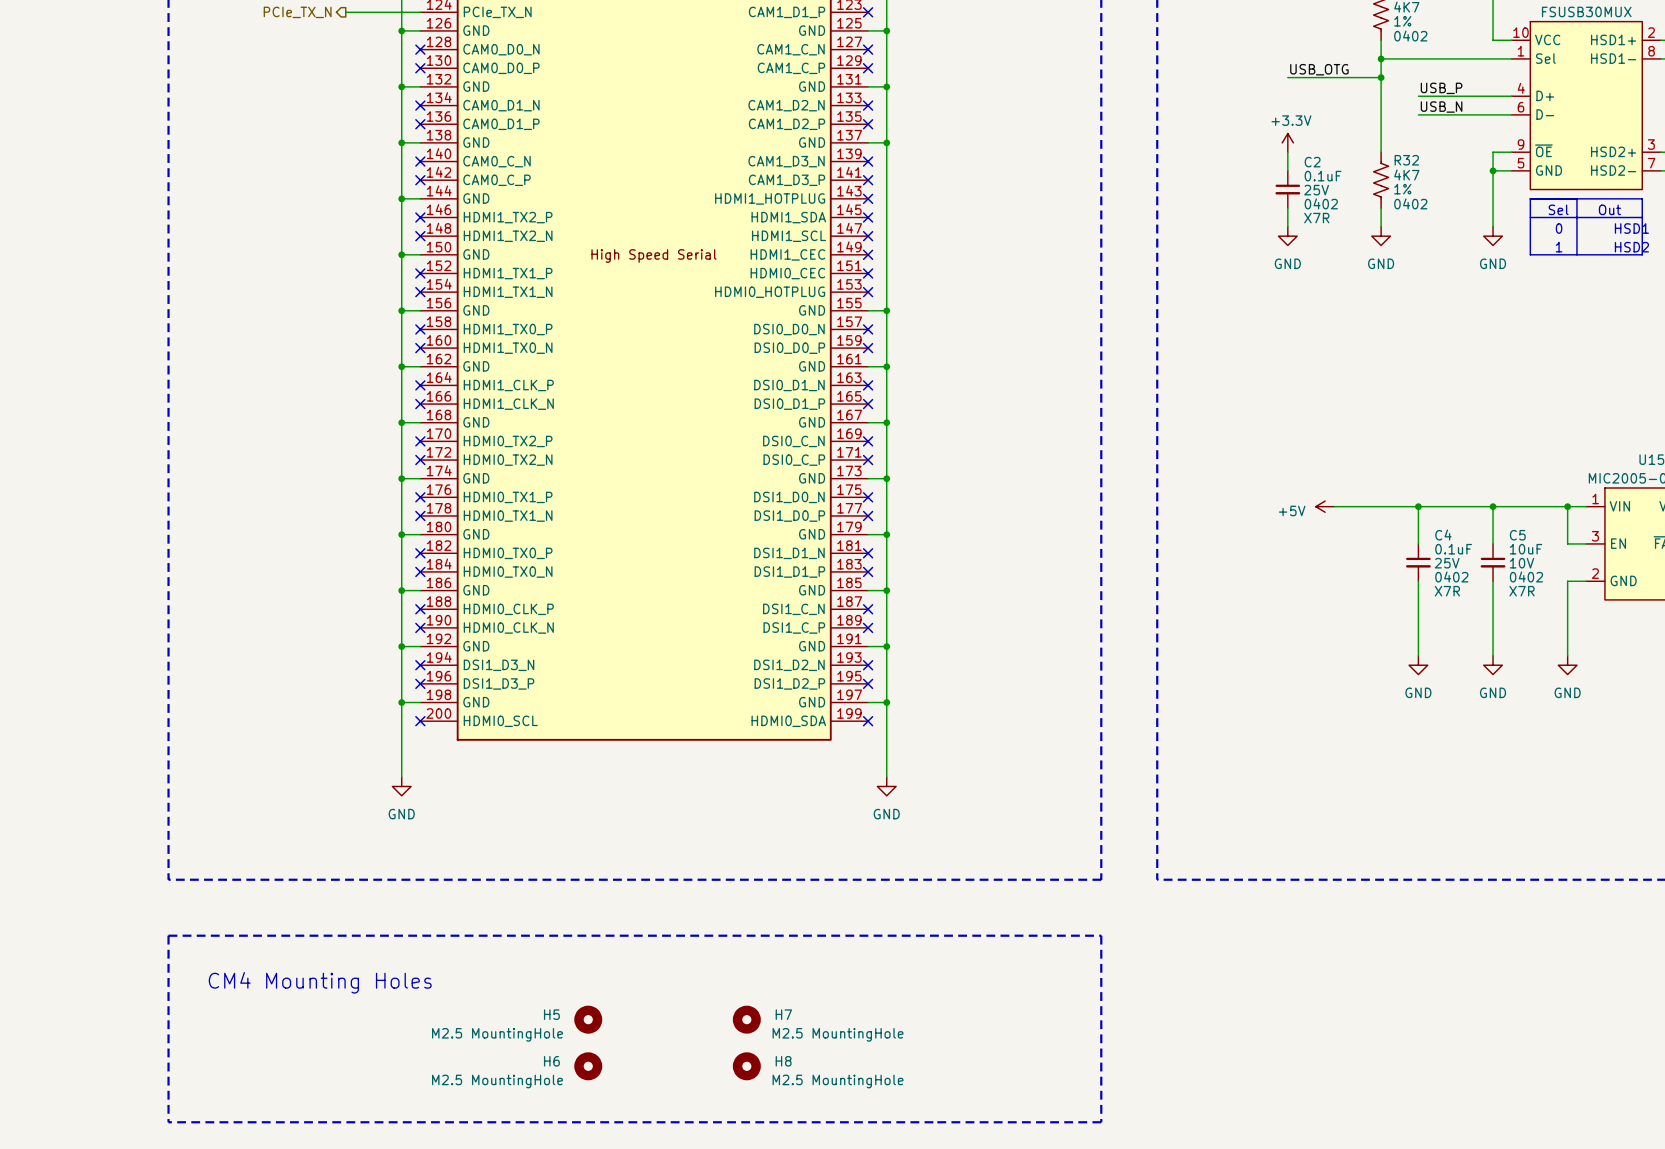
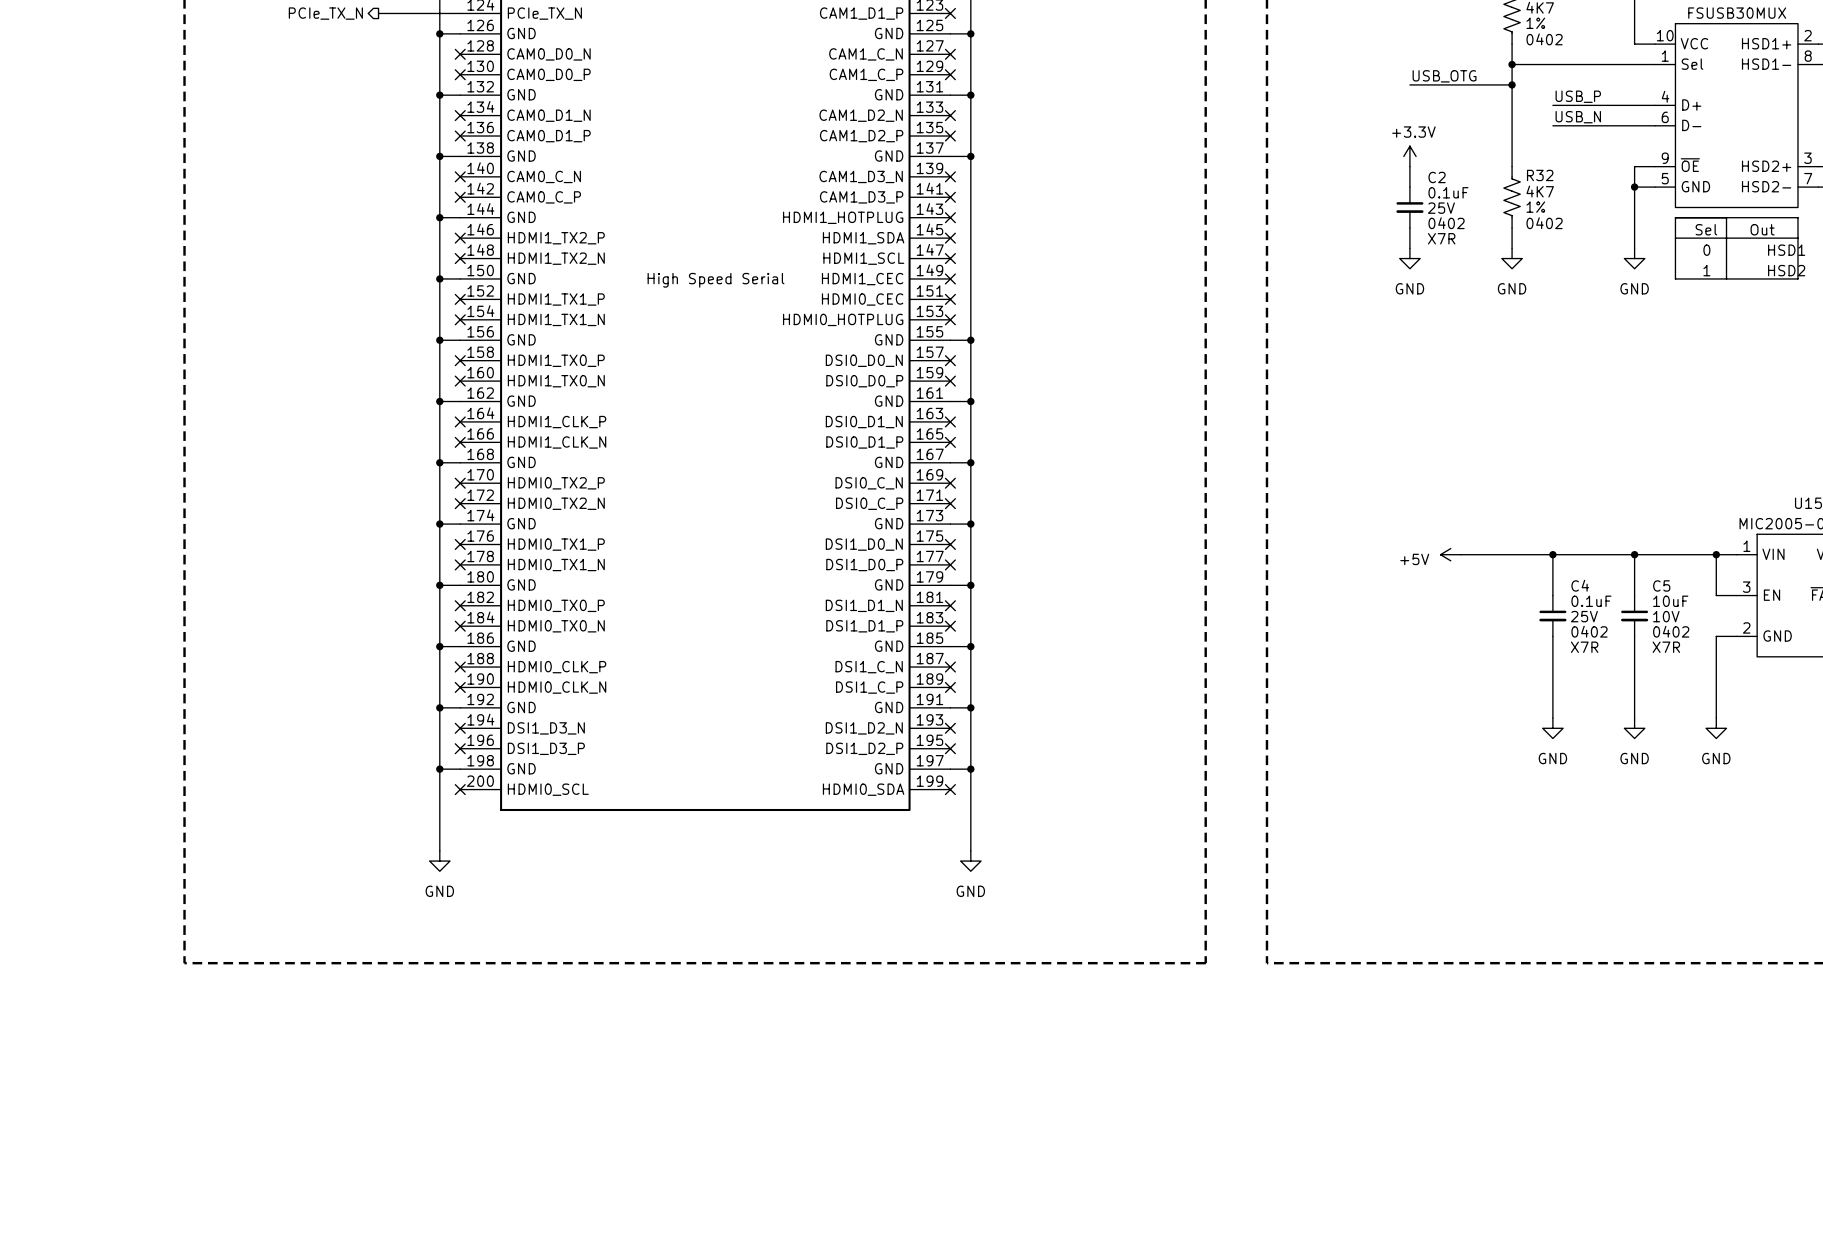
line: (168, 935) (168, 1122) (1101, 1122) (1101, 935) (168, 935) -> none
text: CM4 Mounting Holes (320, 982) -> none
H5: M2.5 MountingHole (588, 1019) -> none
H7: M2.5 MountingHole (746, 1019) -> none
H6: M2.5 MountingHole (588, 1066) -> none
H8: M2.5 MountingHole (746, 1066) -> none

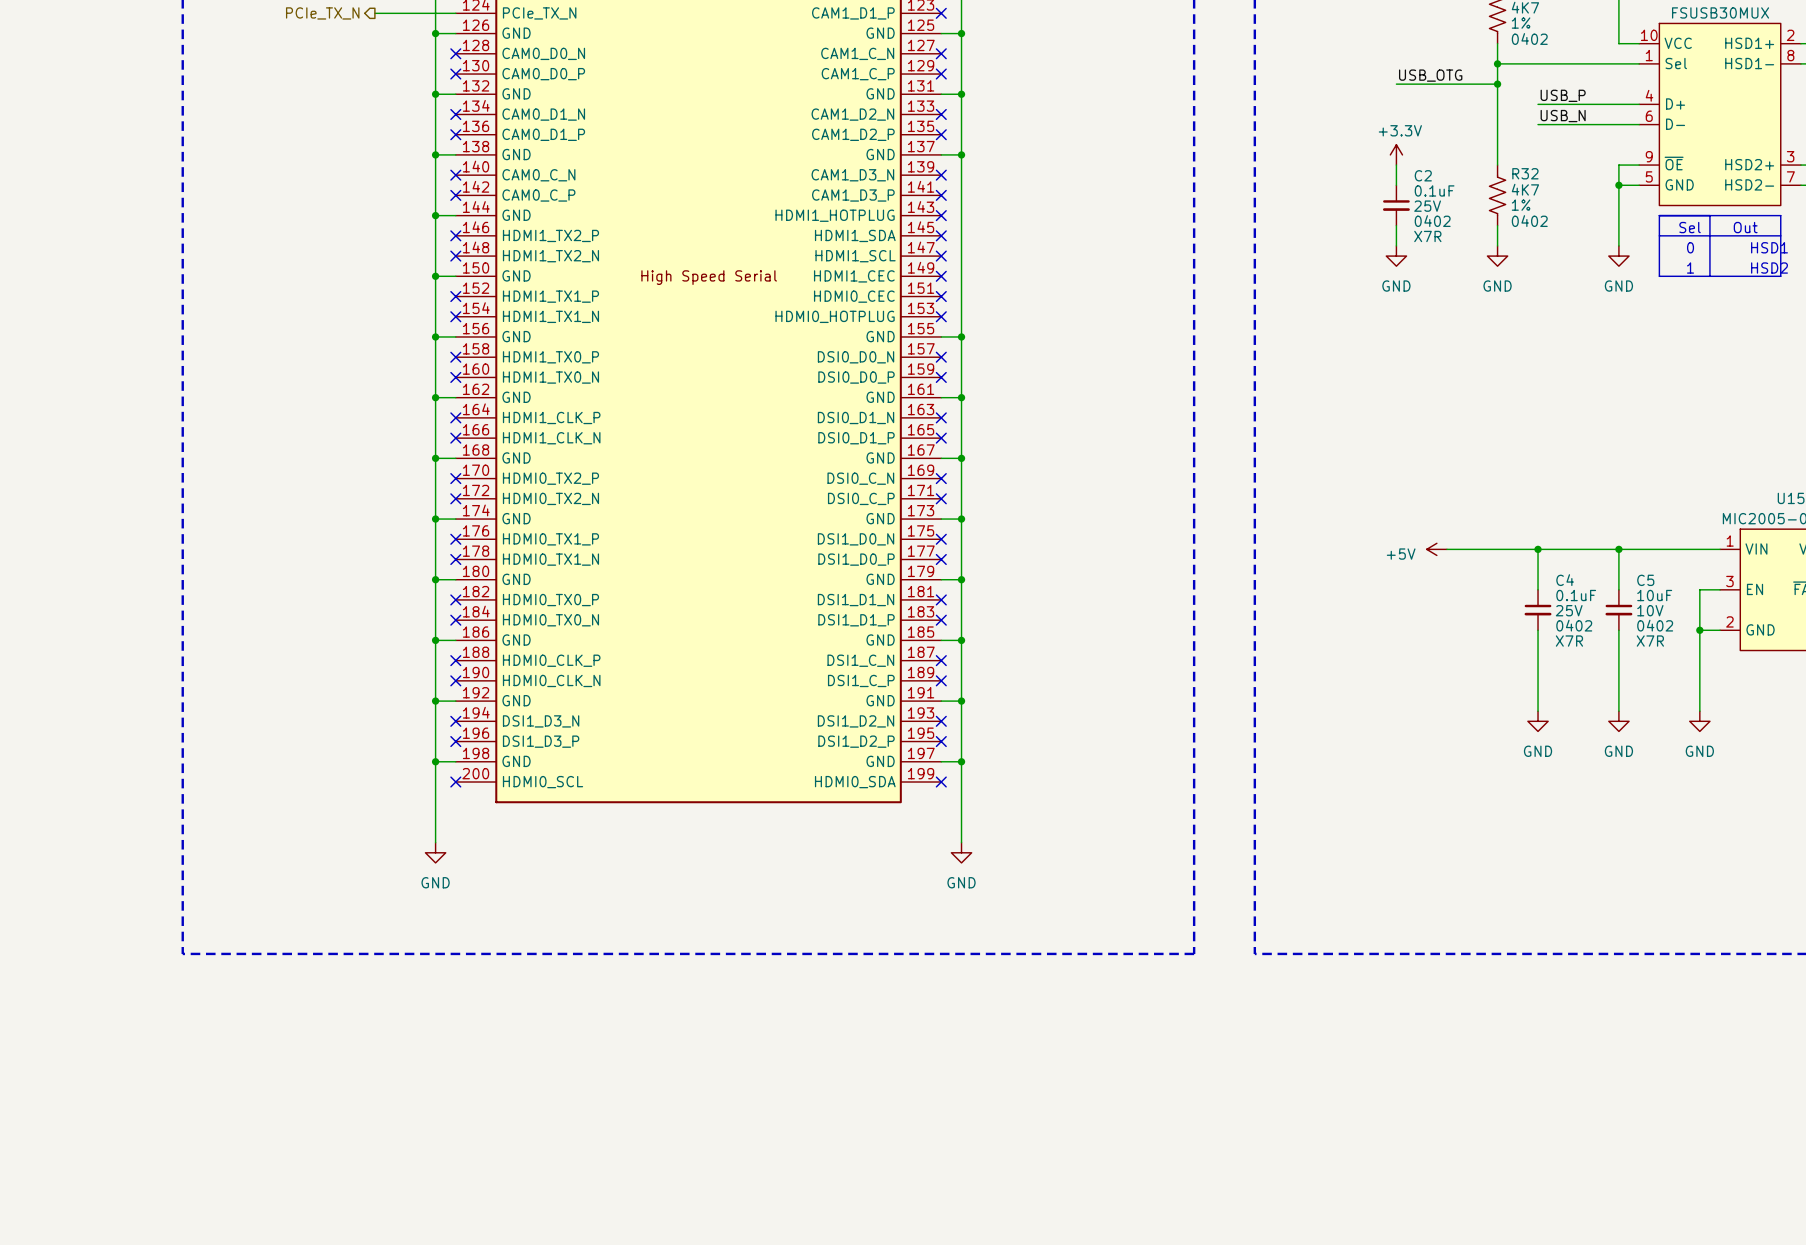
wire: (1716, 554) (1716, 595) -> (1699, 630) (1699, 589)
junction: (1716, 554) -> none
junction: none -> (1699, 630)

